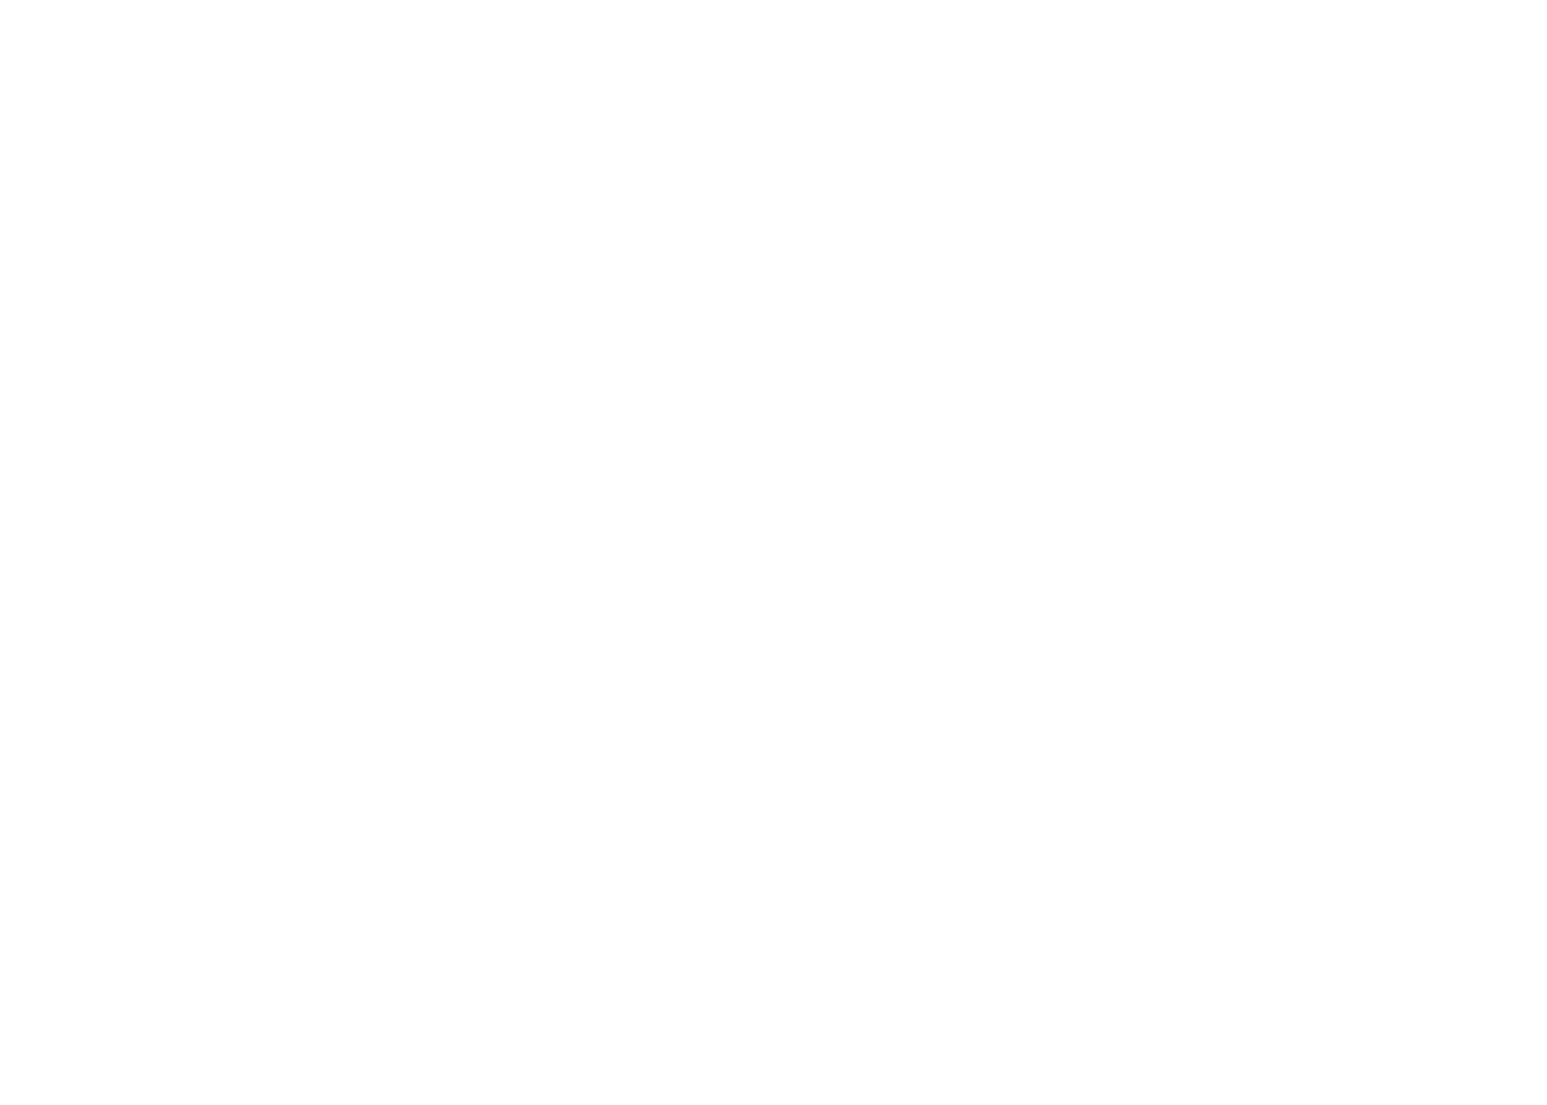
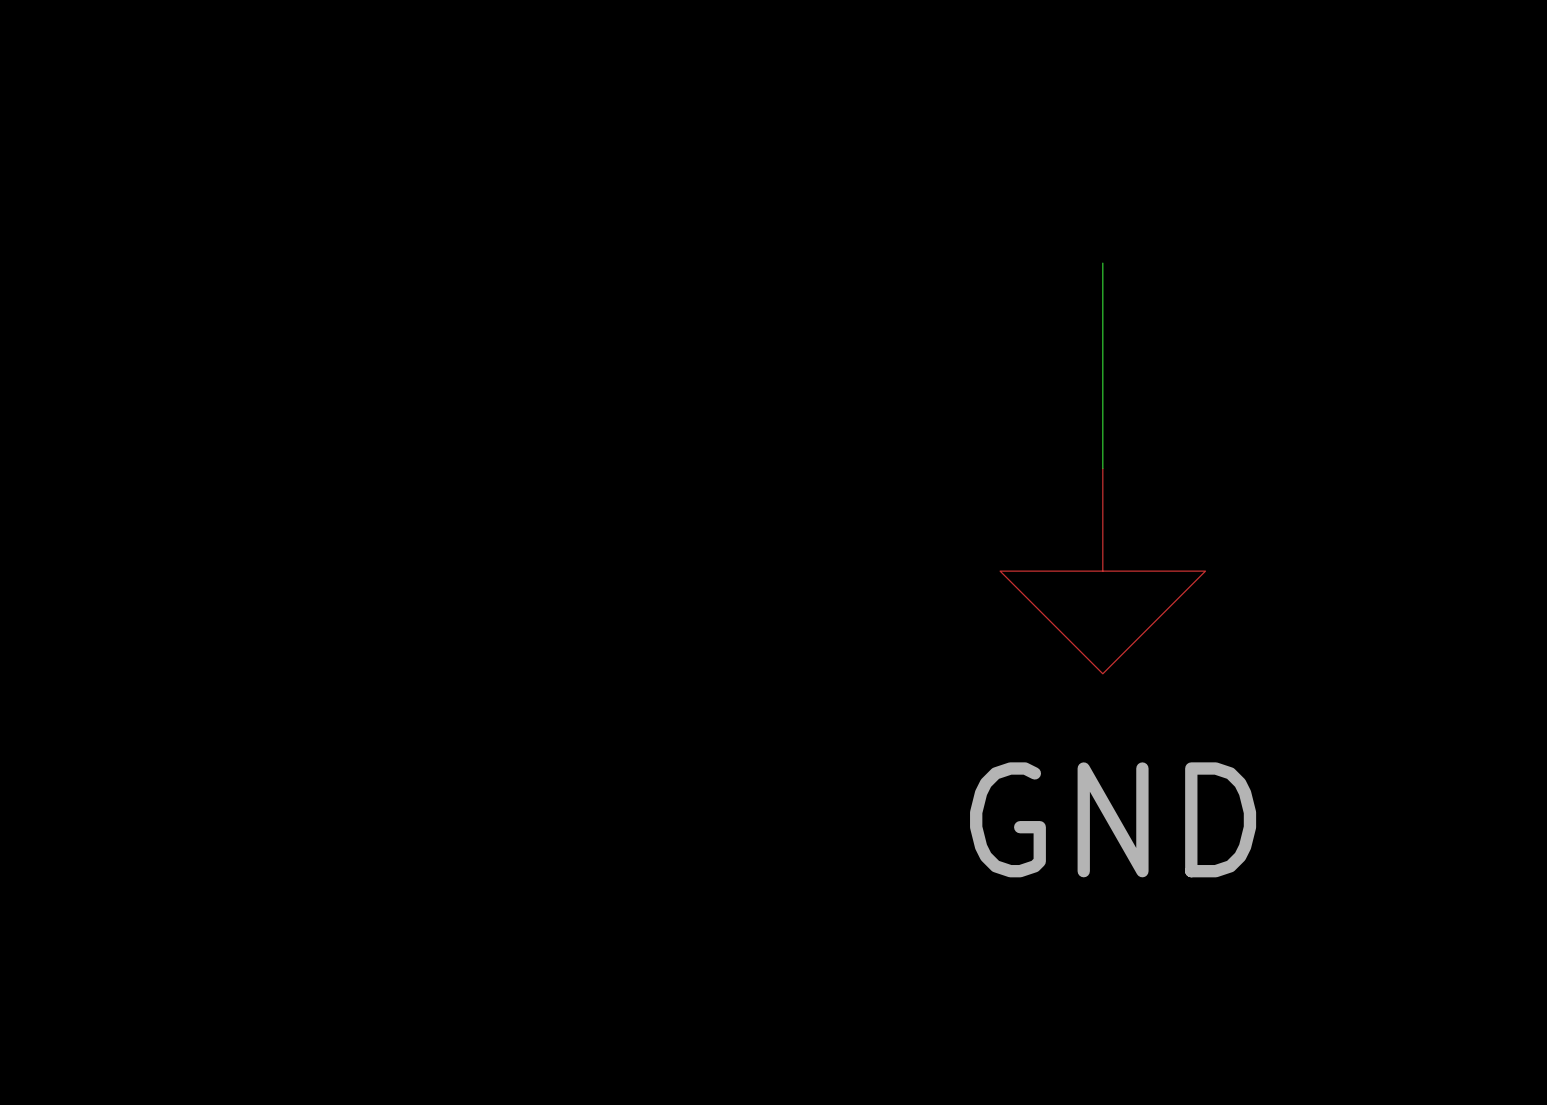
wire: none -> (1102, 263) (1102, 468)
power symbol: none -> GND (1102, 571)

